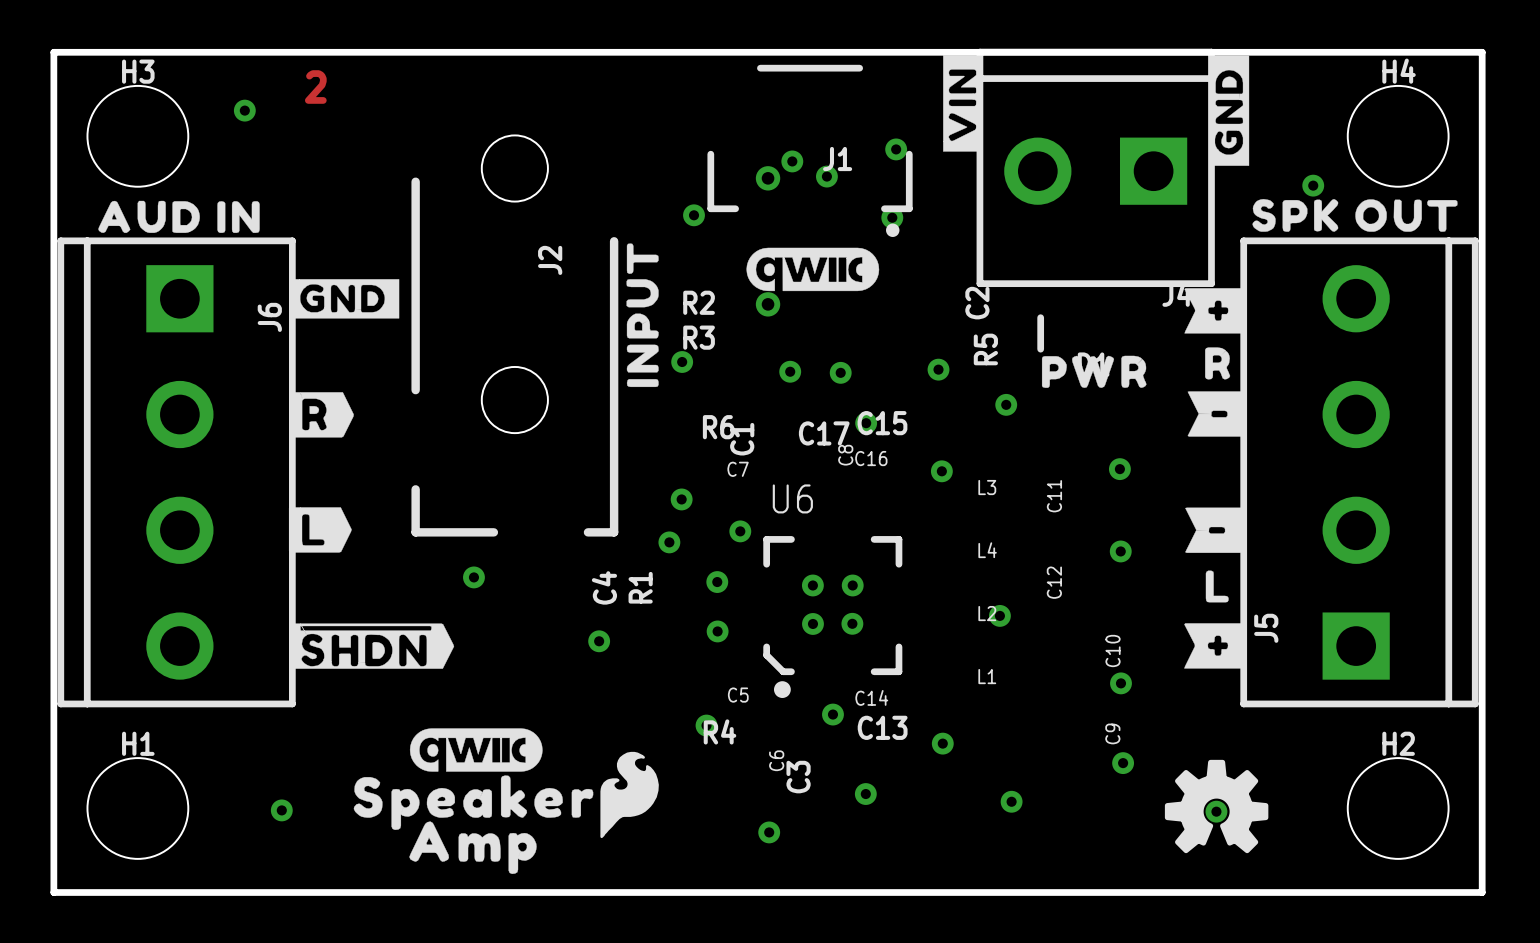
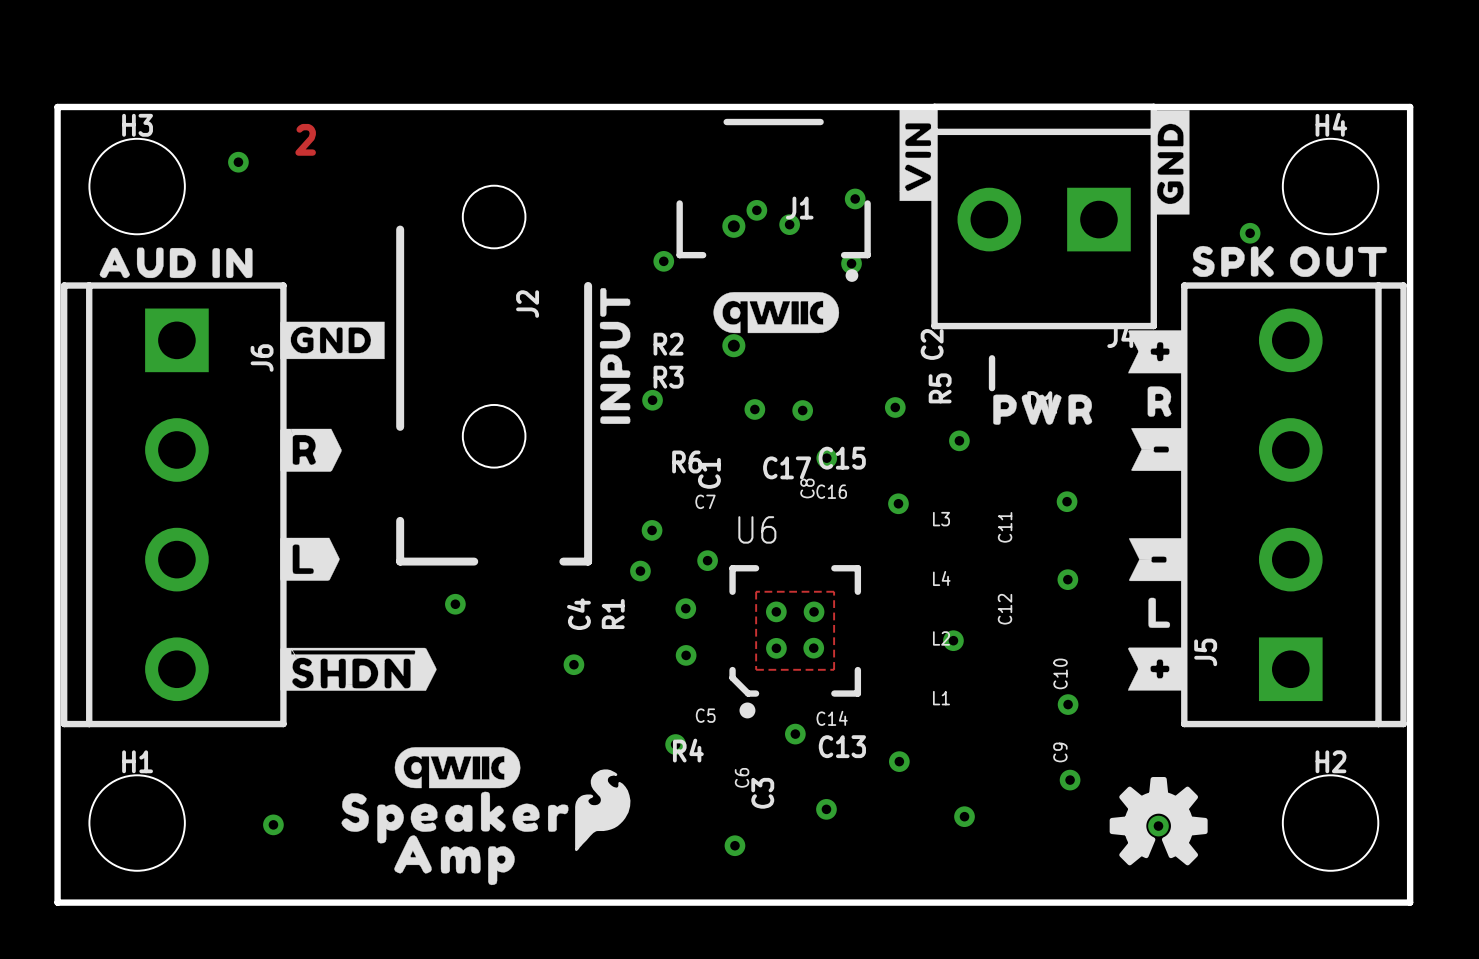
zone outline: none -> (756, 591) (756, 669) (834, 669) (834, 591) (756, 591)

